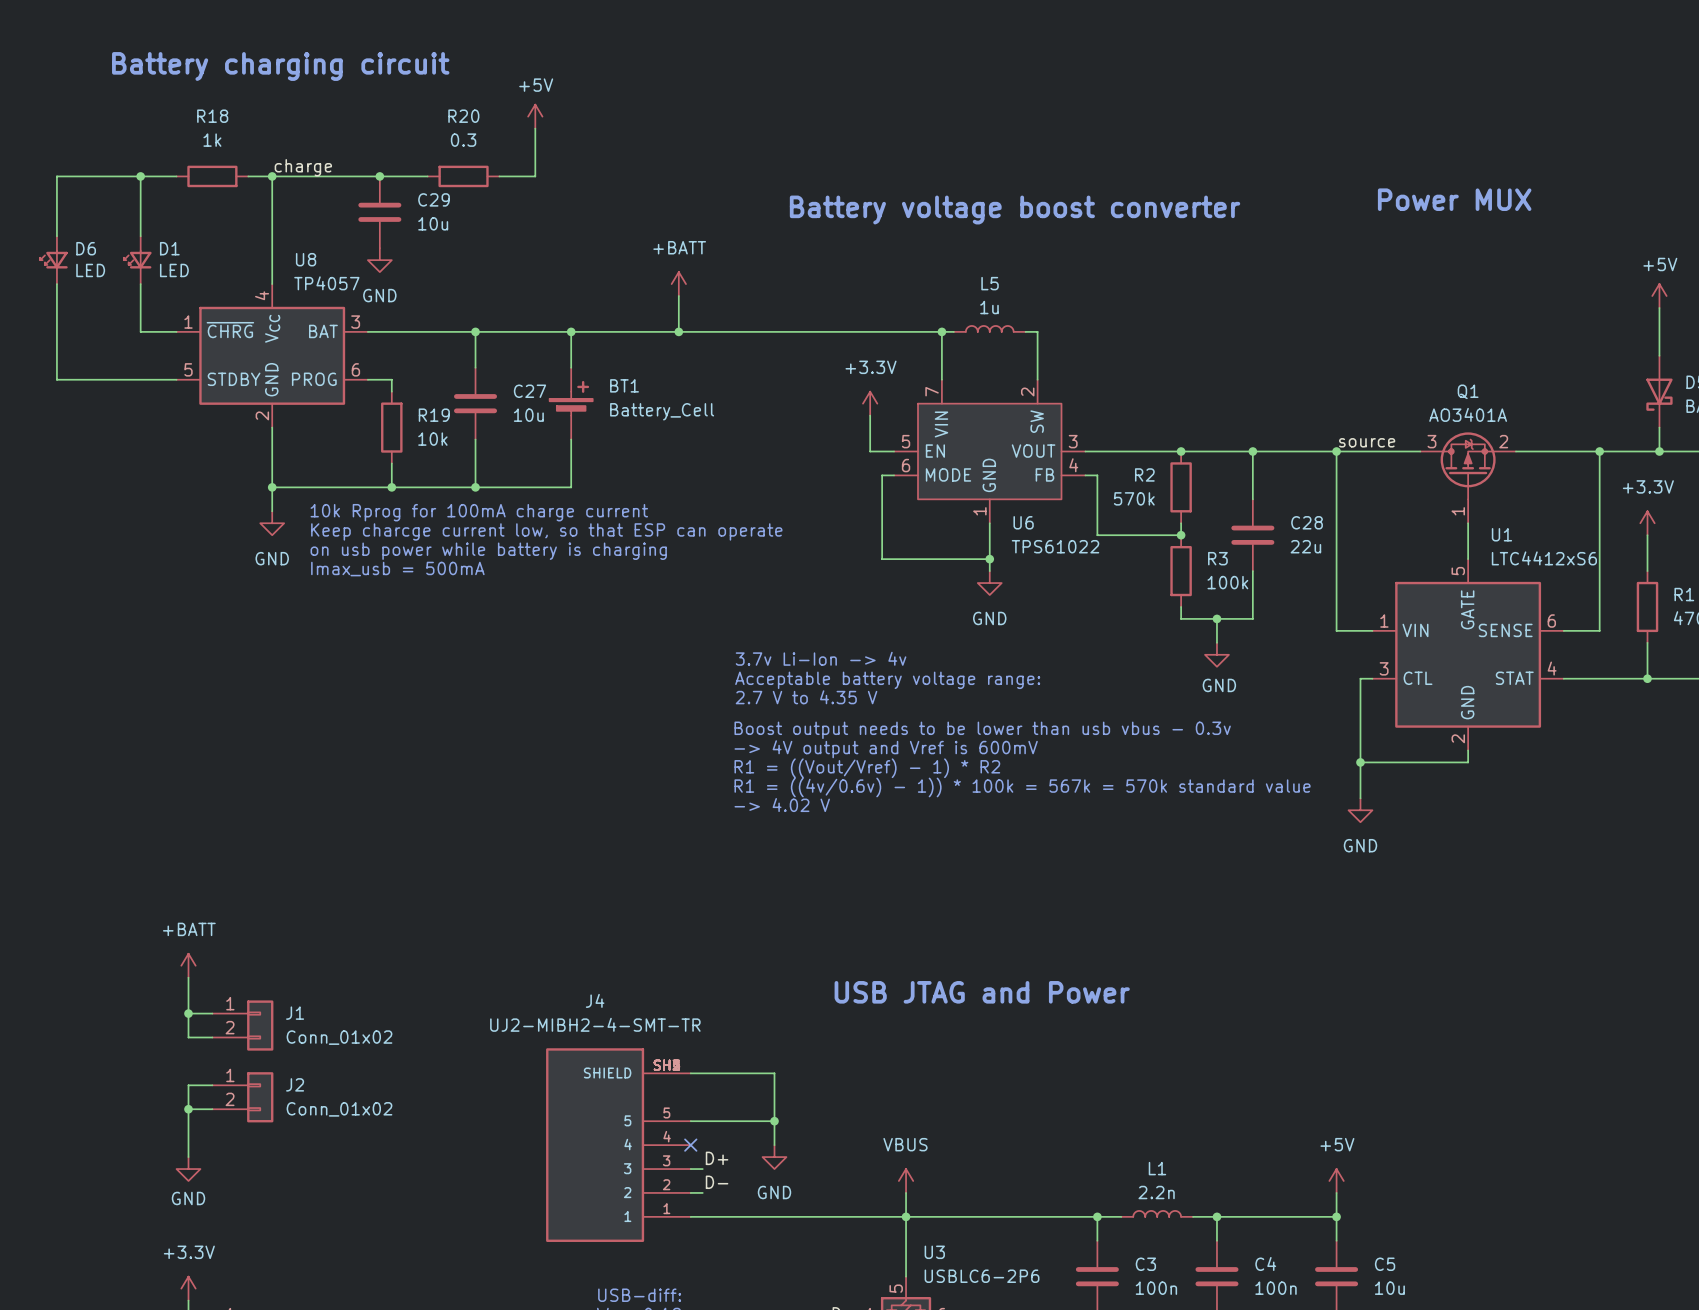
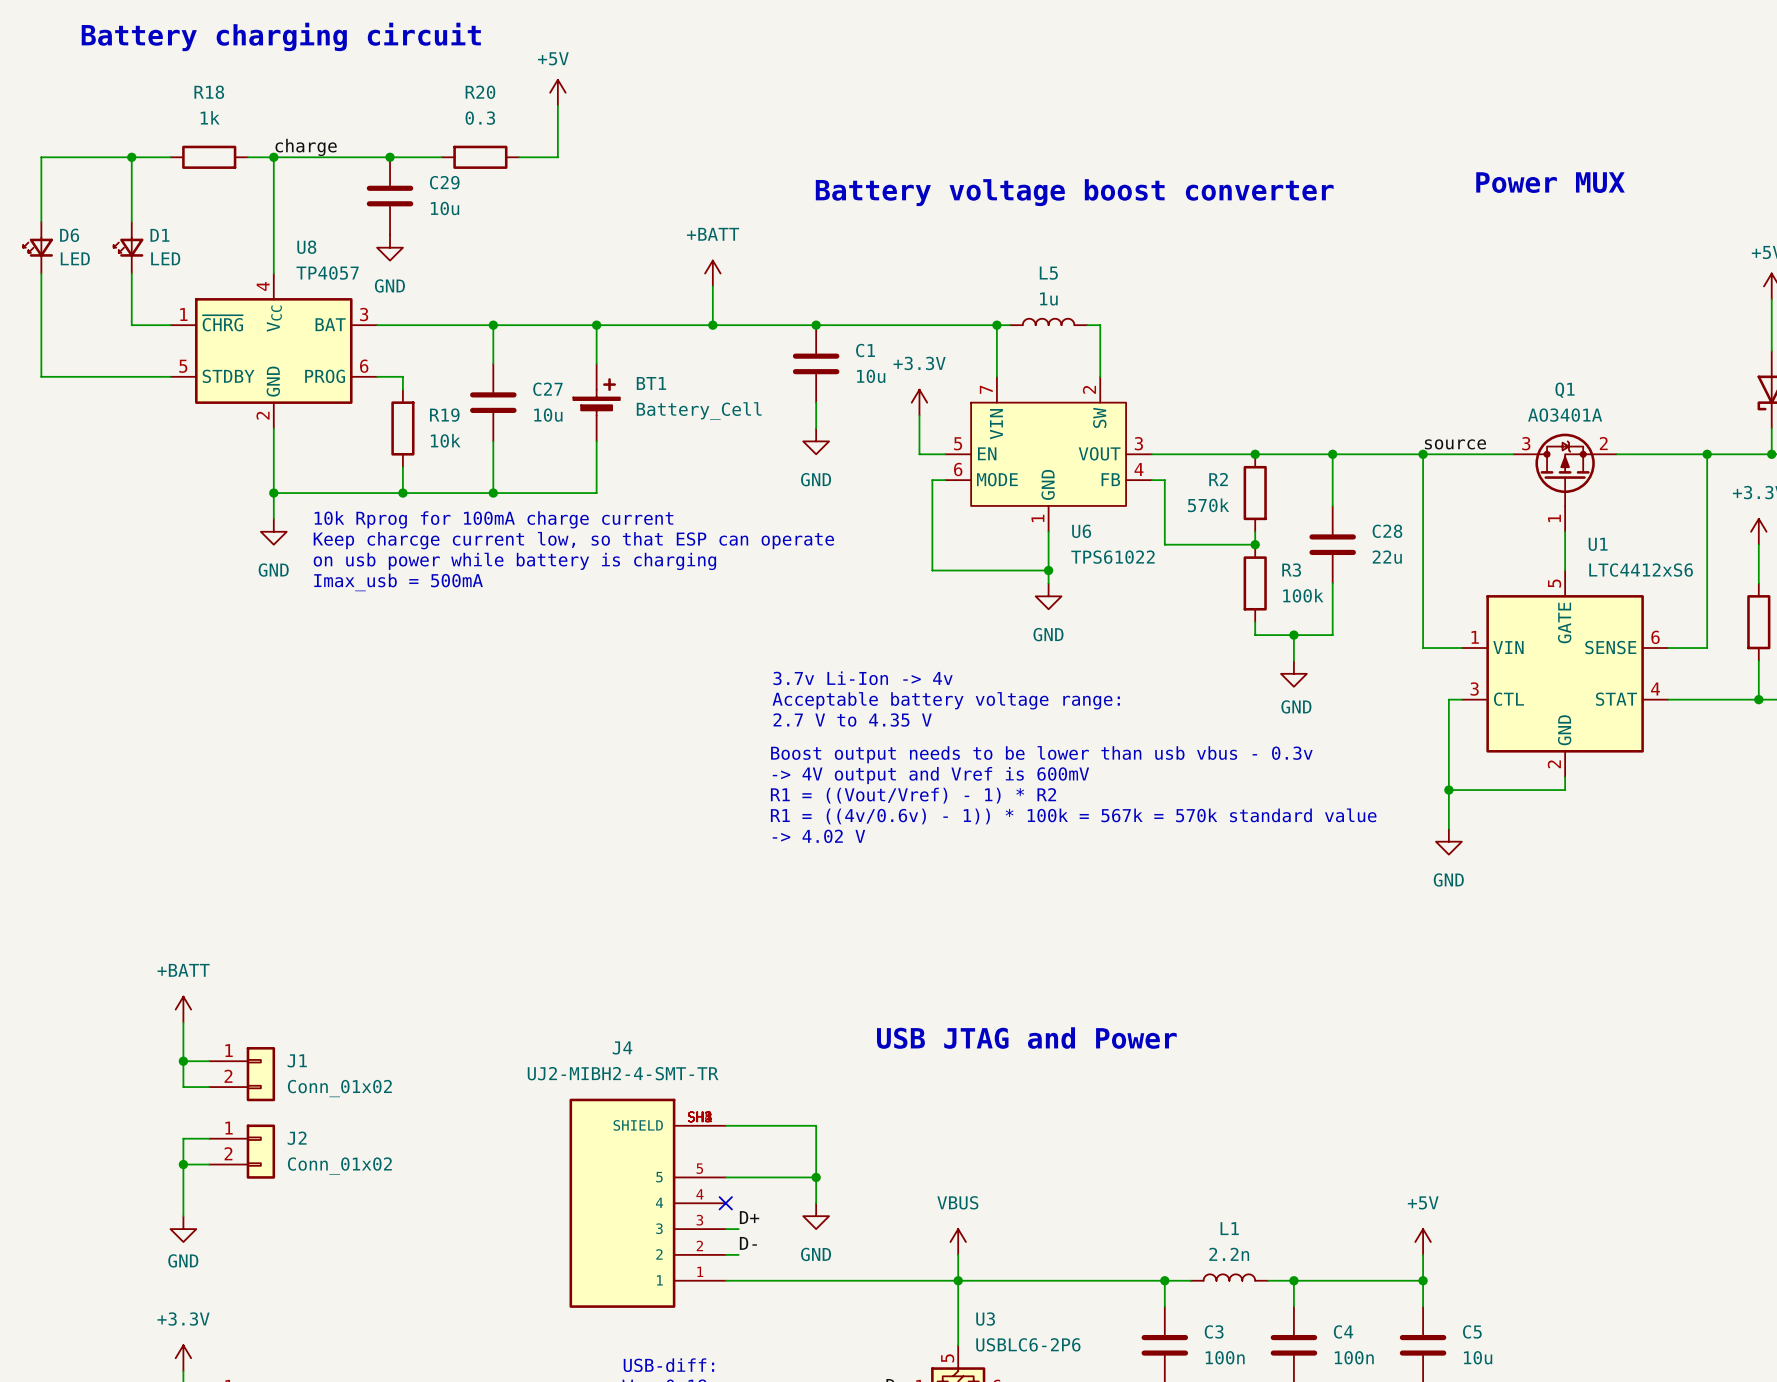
junction: none -> (816, 325)
C1: none -> 10u (816, 363)
wire: none -> (816, 402) (816, 428)
power symbol: none -> GND (816, 441)

